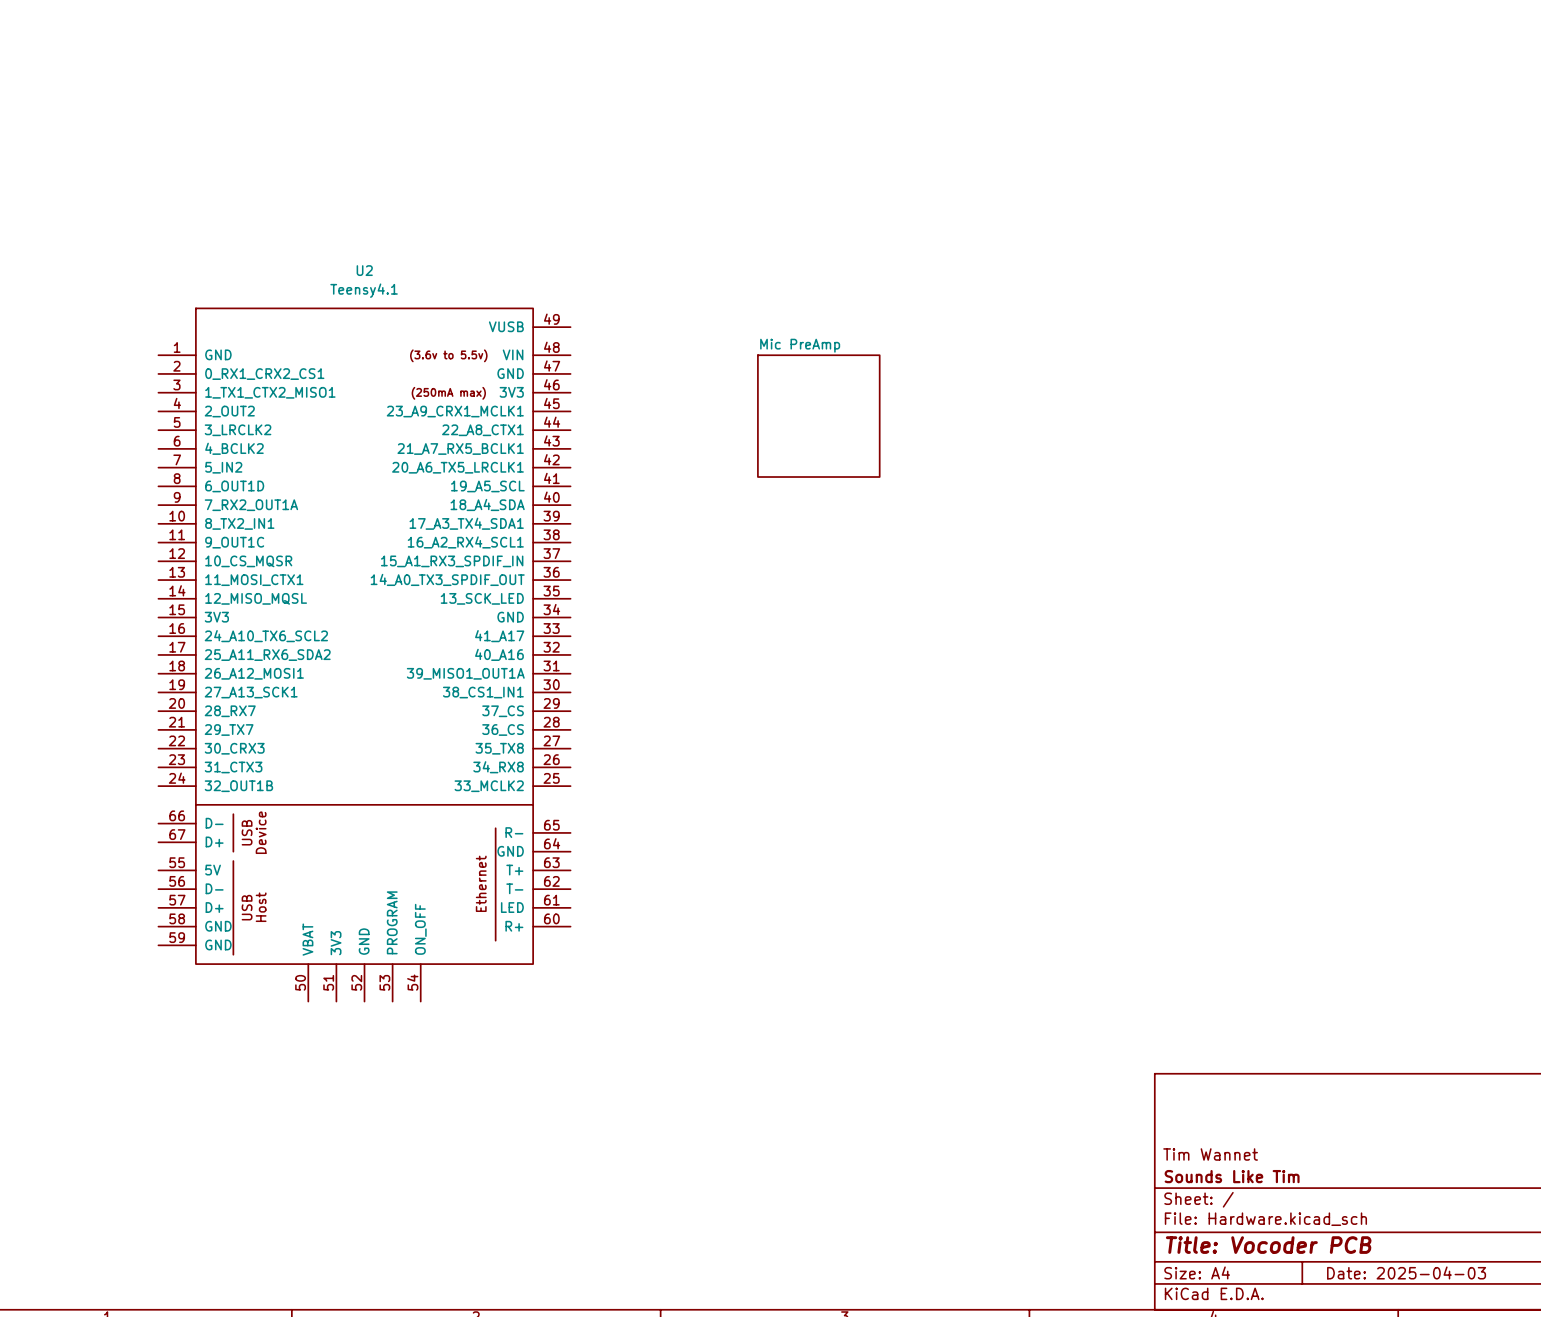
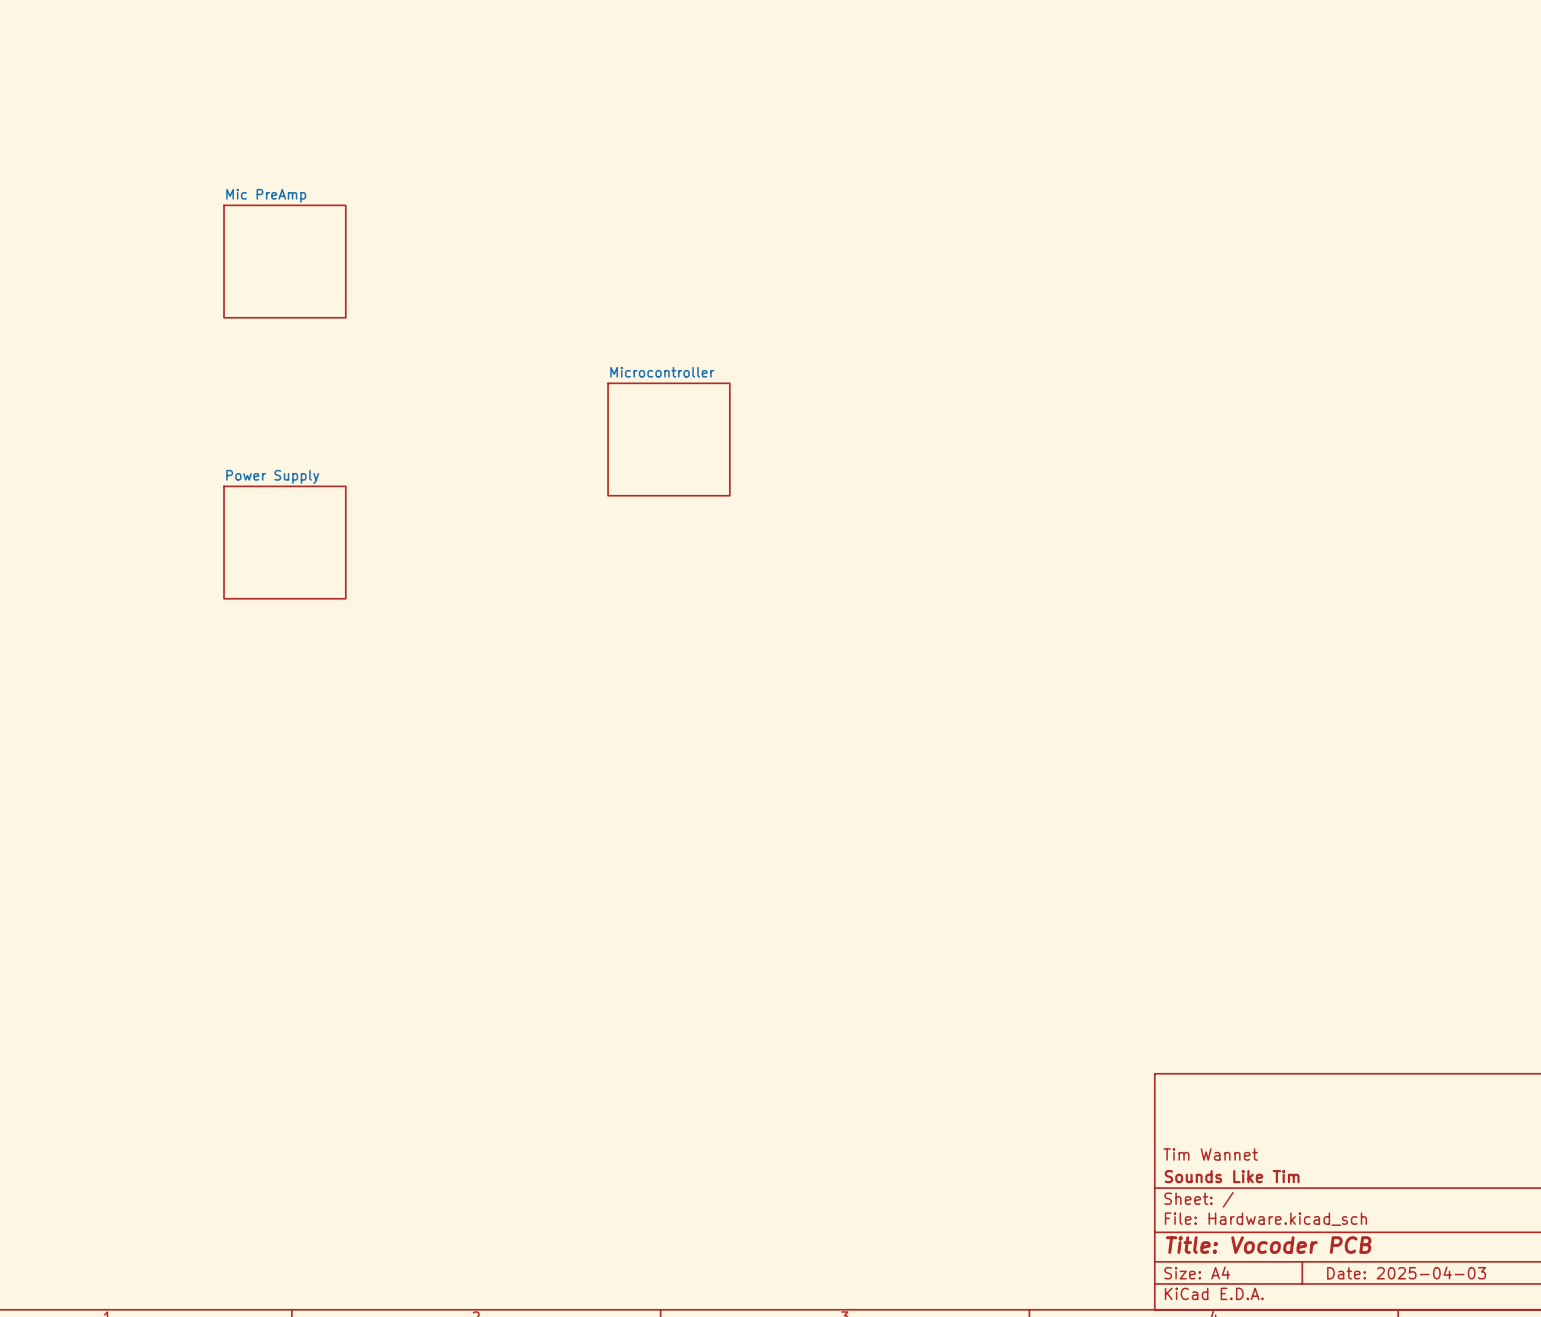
sheet Mic PreAmp: none -> (284, 261)
sheet Mic PreAmp: (818, 416) -> none
sheet Microcontroller: none -> (668, 439)
sheet Power Supply: none -> (284, 542)
U2: Teensy4.1 (364, 654) -> none

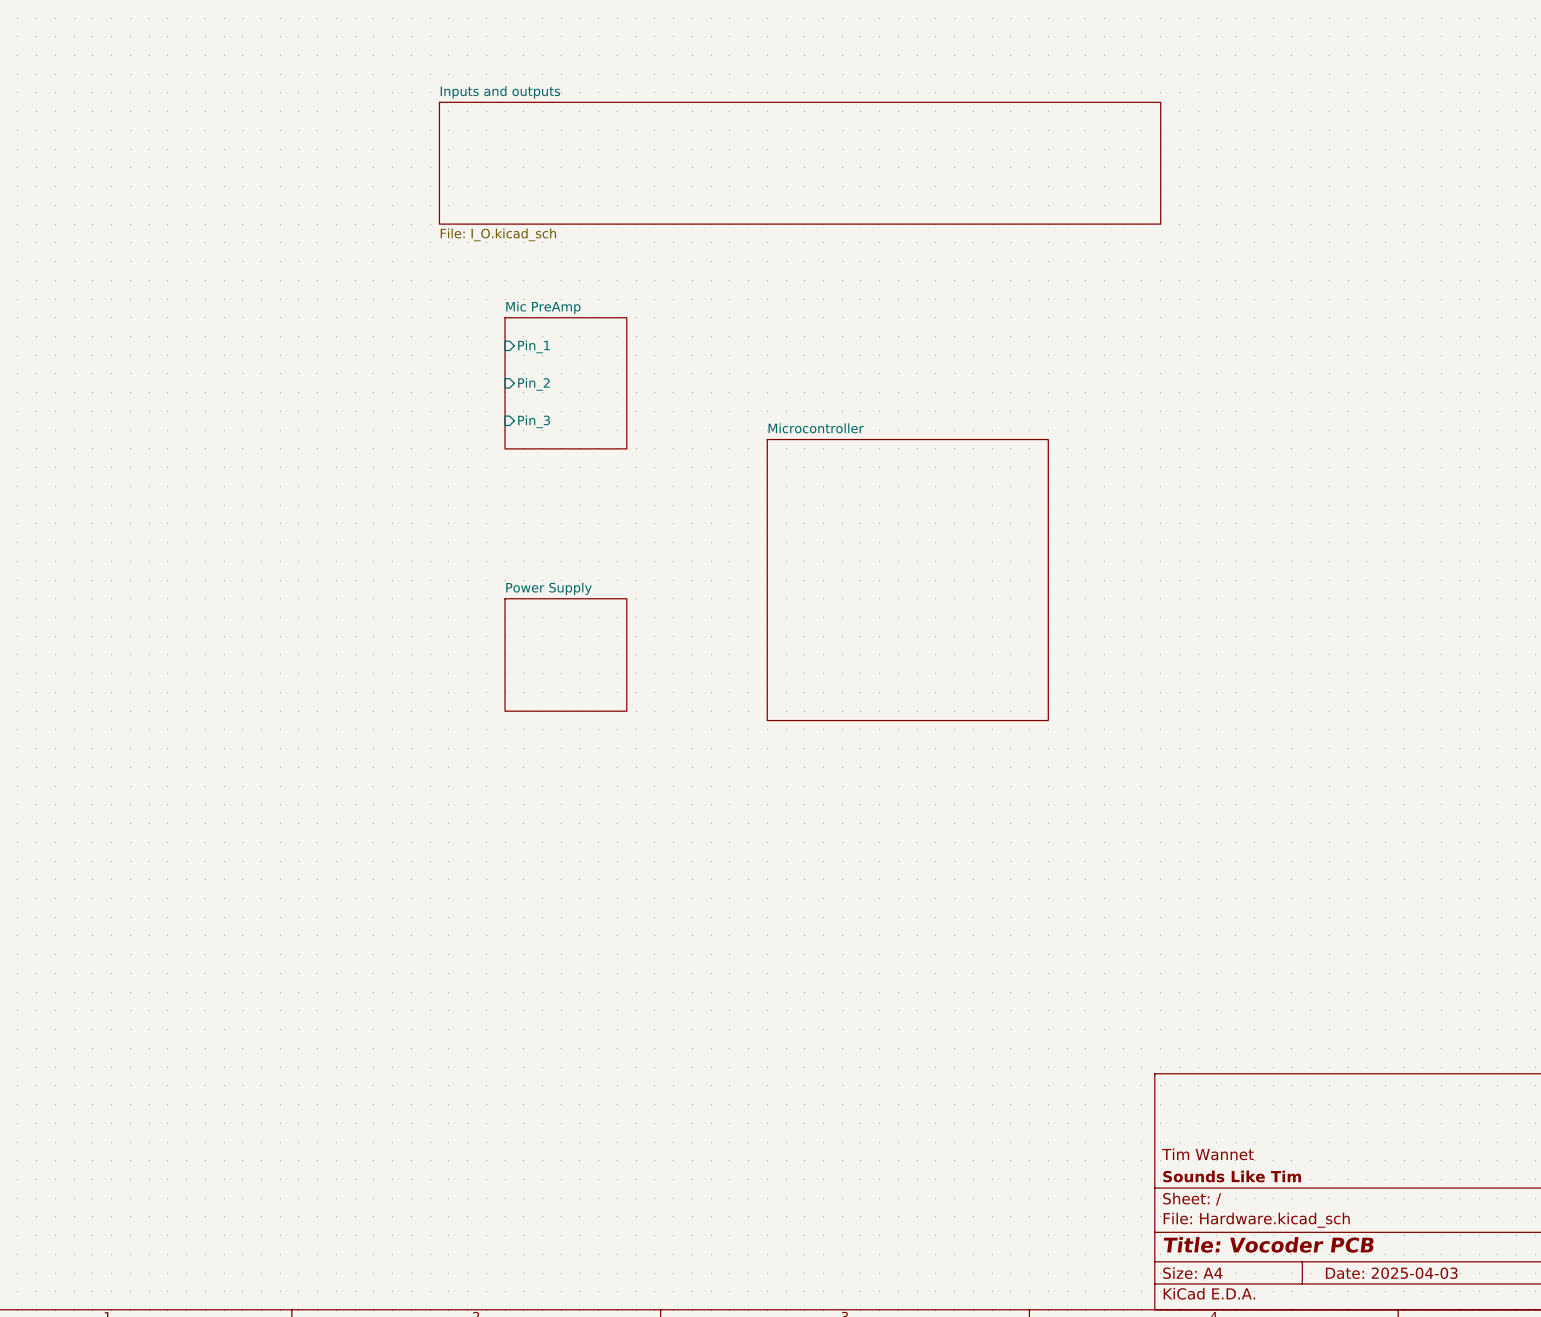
sheet Inputs and outputs: none -> File: I_O.kicad_sch (800, 163)
sheet Mic PreAmp: (284, 261) -> none
sheet pin: none -> Pin_1 (533, 346)
sheet pin: none -> Pin_2 (533, 384)
sheet Mic PreAmp: none -> (565, 383)
sheet pin: none -> Pin_3 (534, 421)
sheet Microcontroller: (668, 439) -> none
sheet Power Supply: (284, 542) -> none
sheet Microcontroller: none -> (907, 580)
sheet Power Supply: none -> (565, 654)

